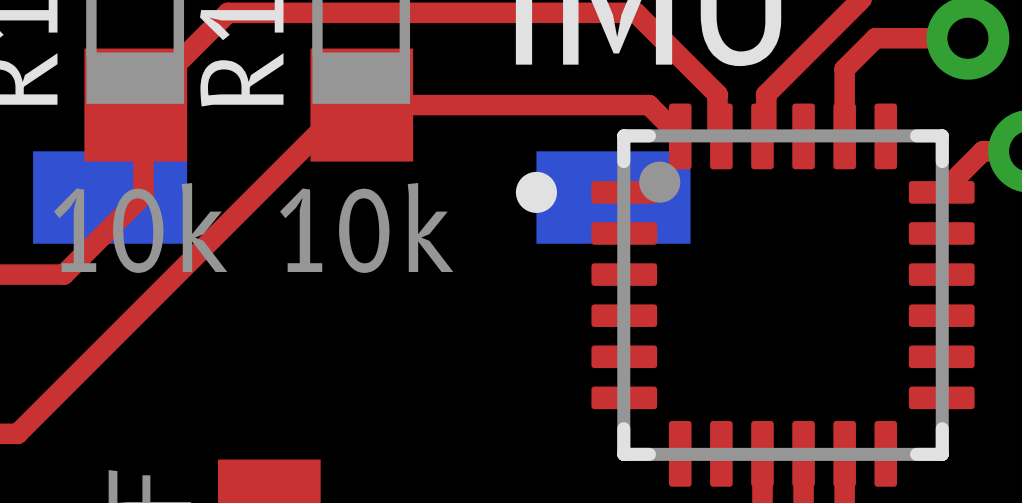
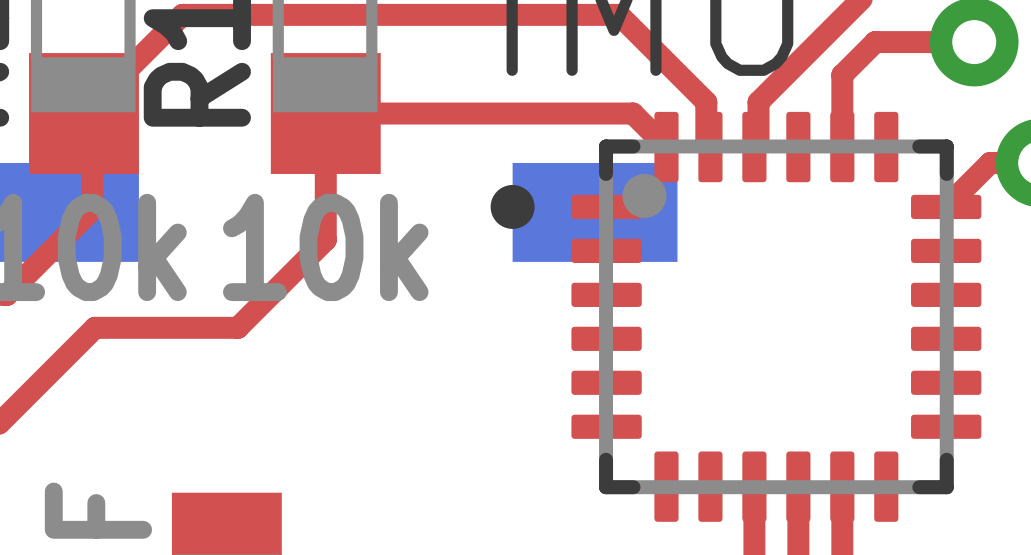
top track: (361, 105) (346, 105) (146, 305) -> (325, 113) (325, 239) (237, 327) (94, 327)

